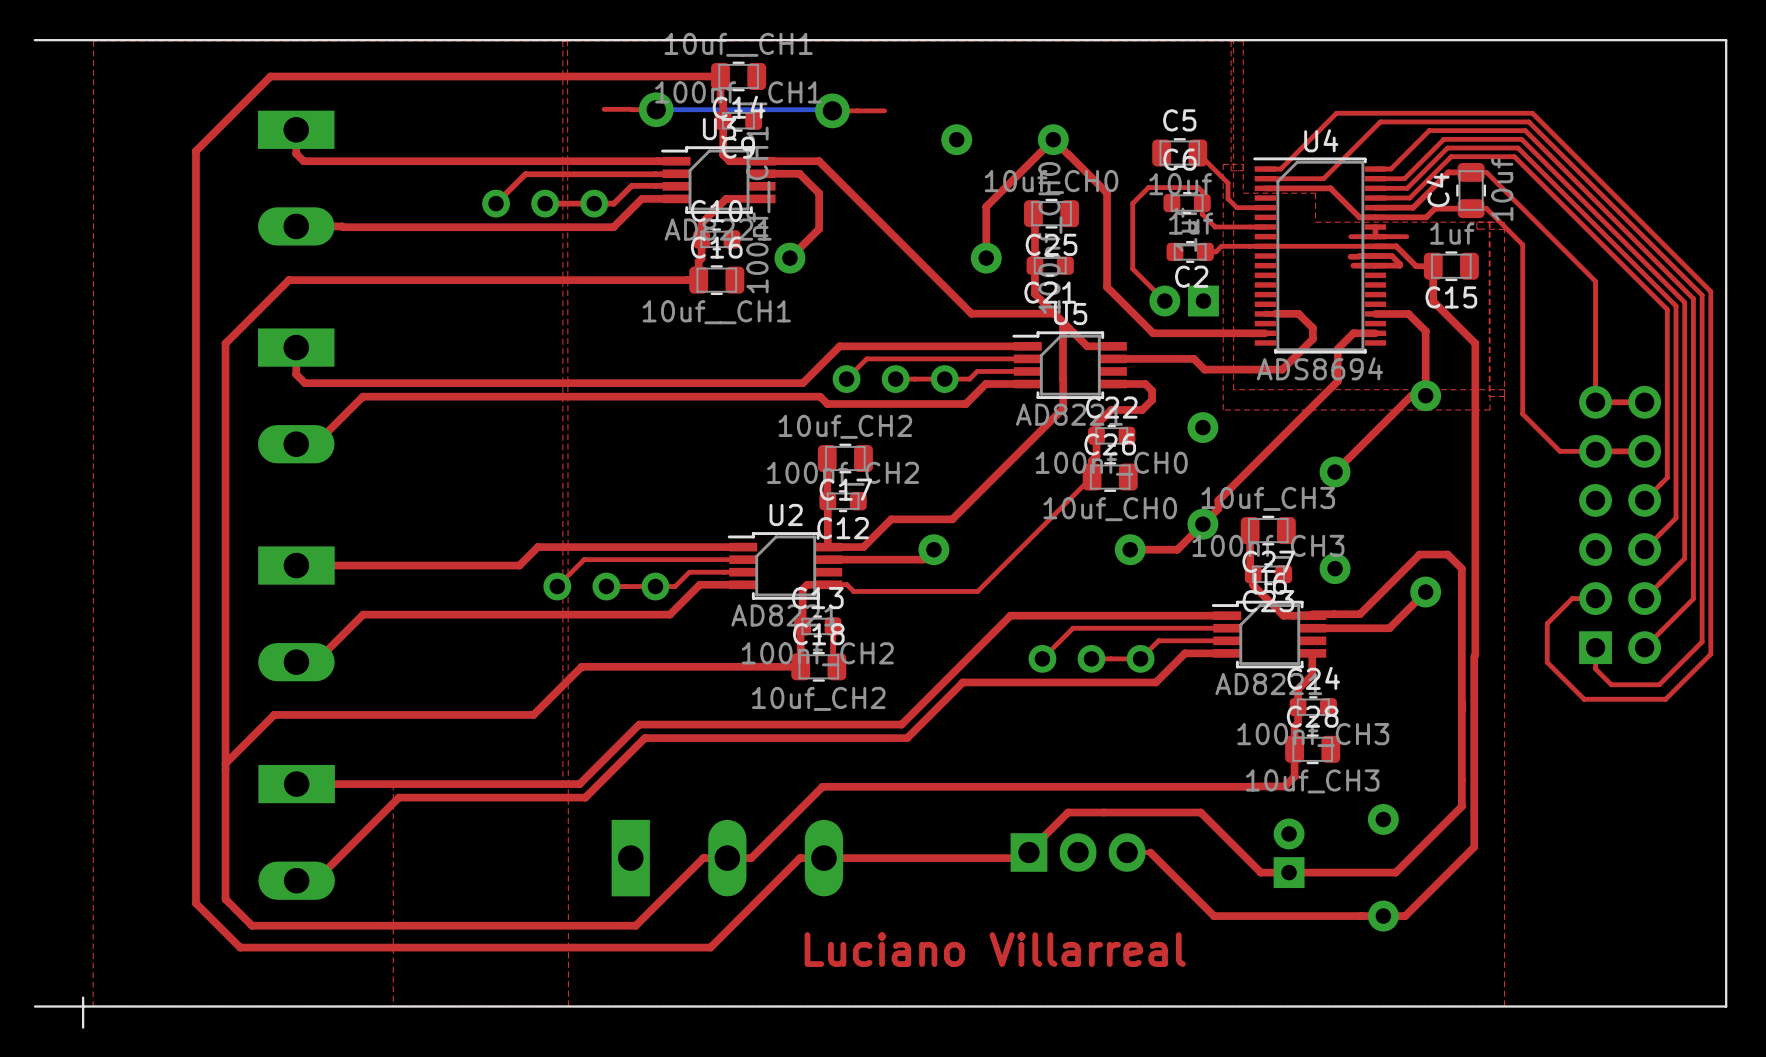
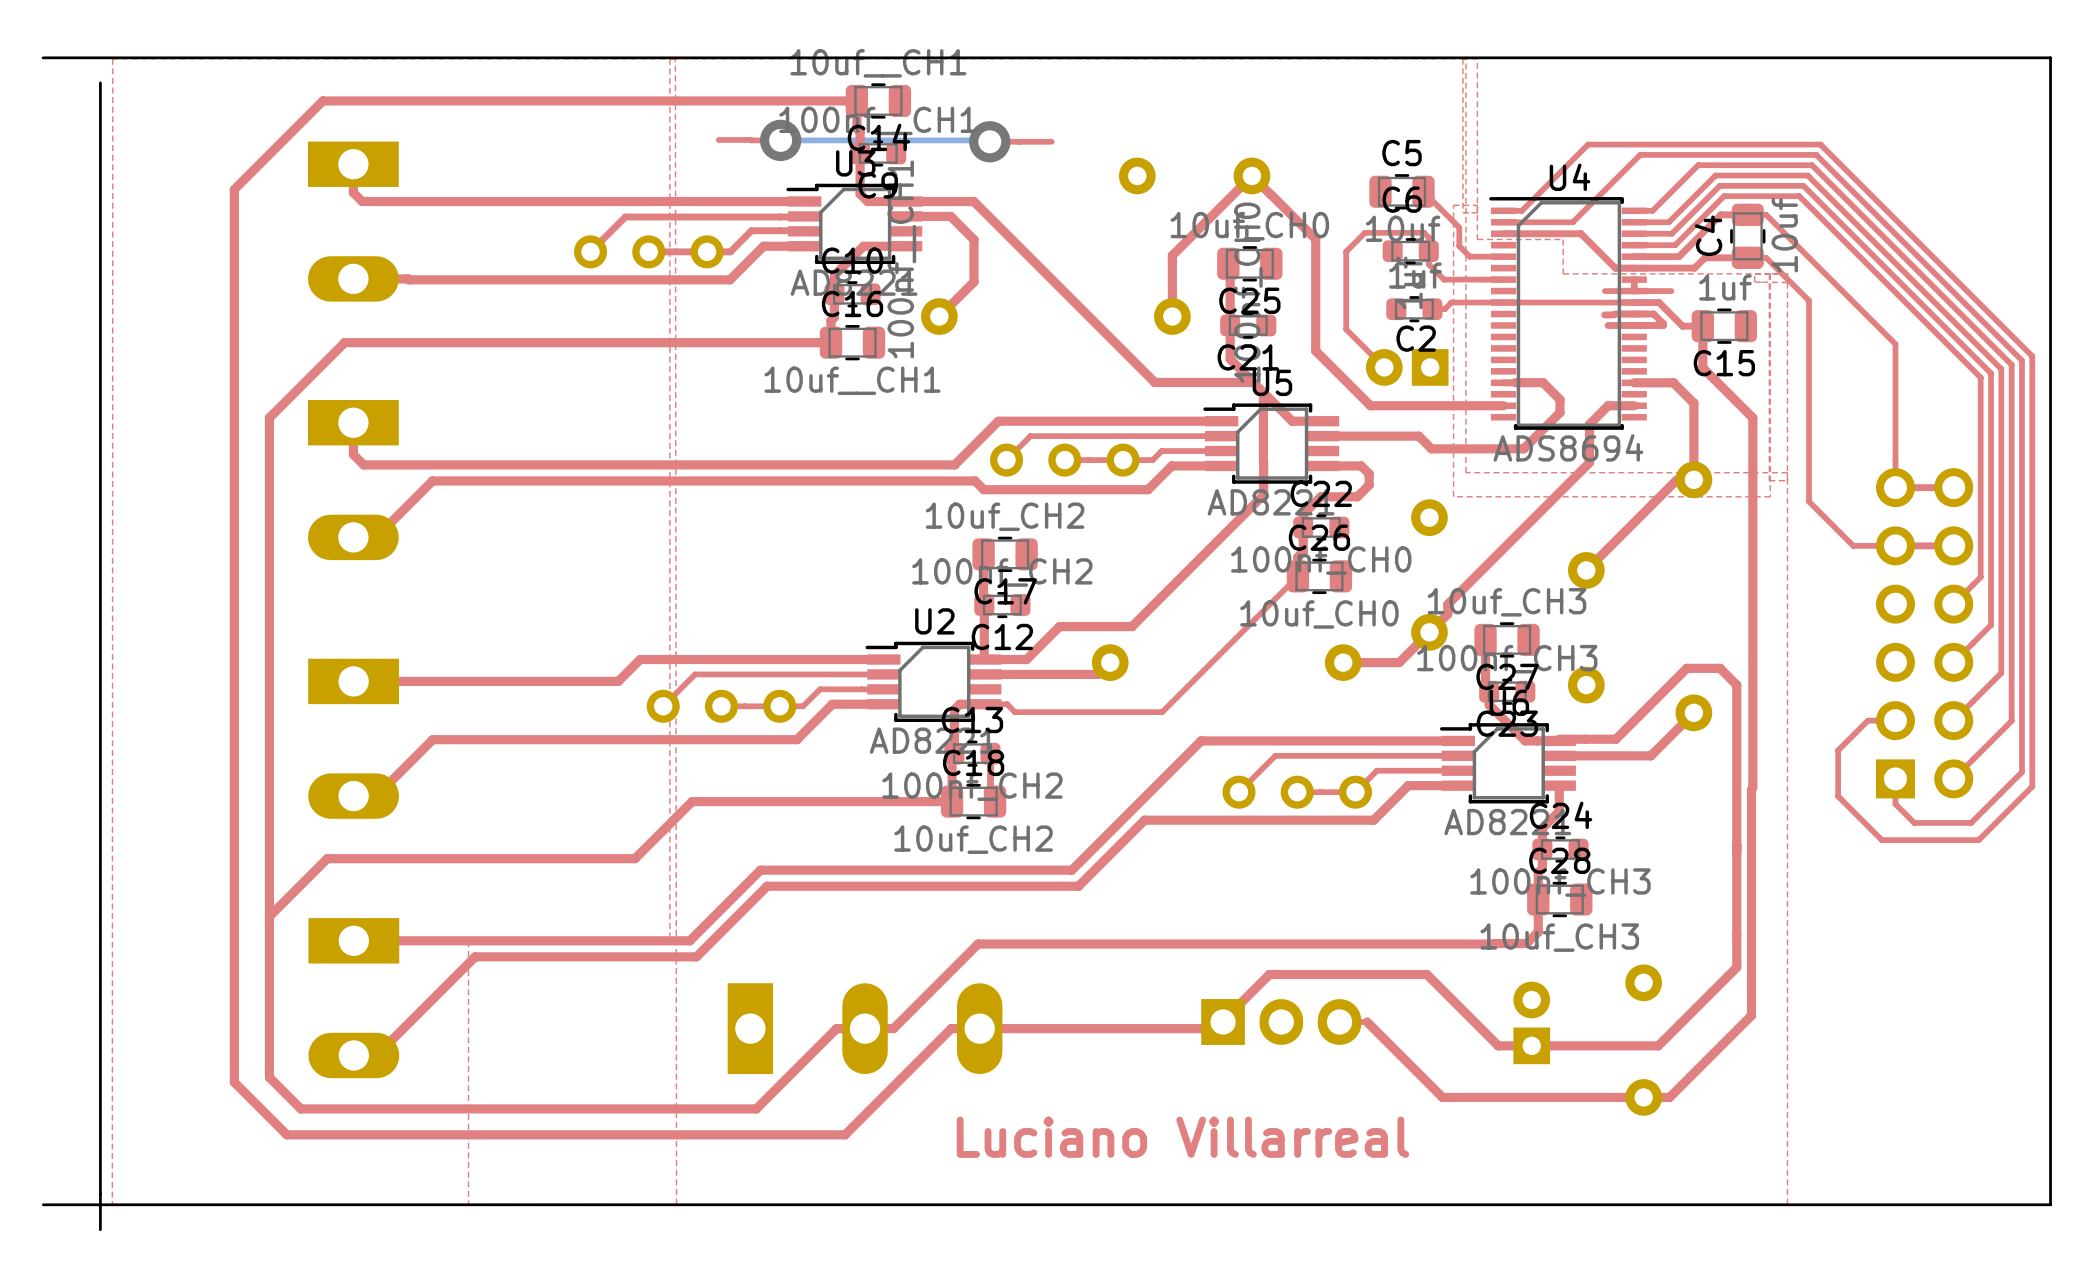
line: none -> (100, 82) (100, 1194)

